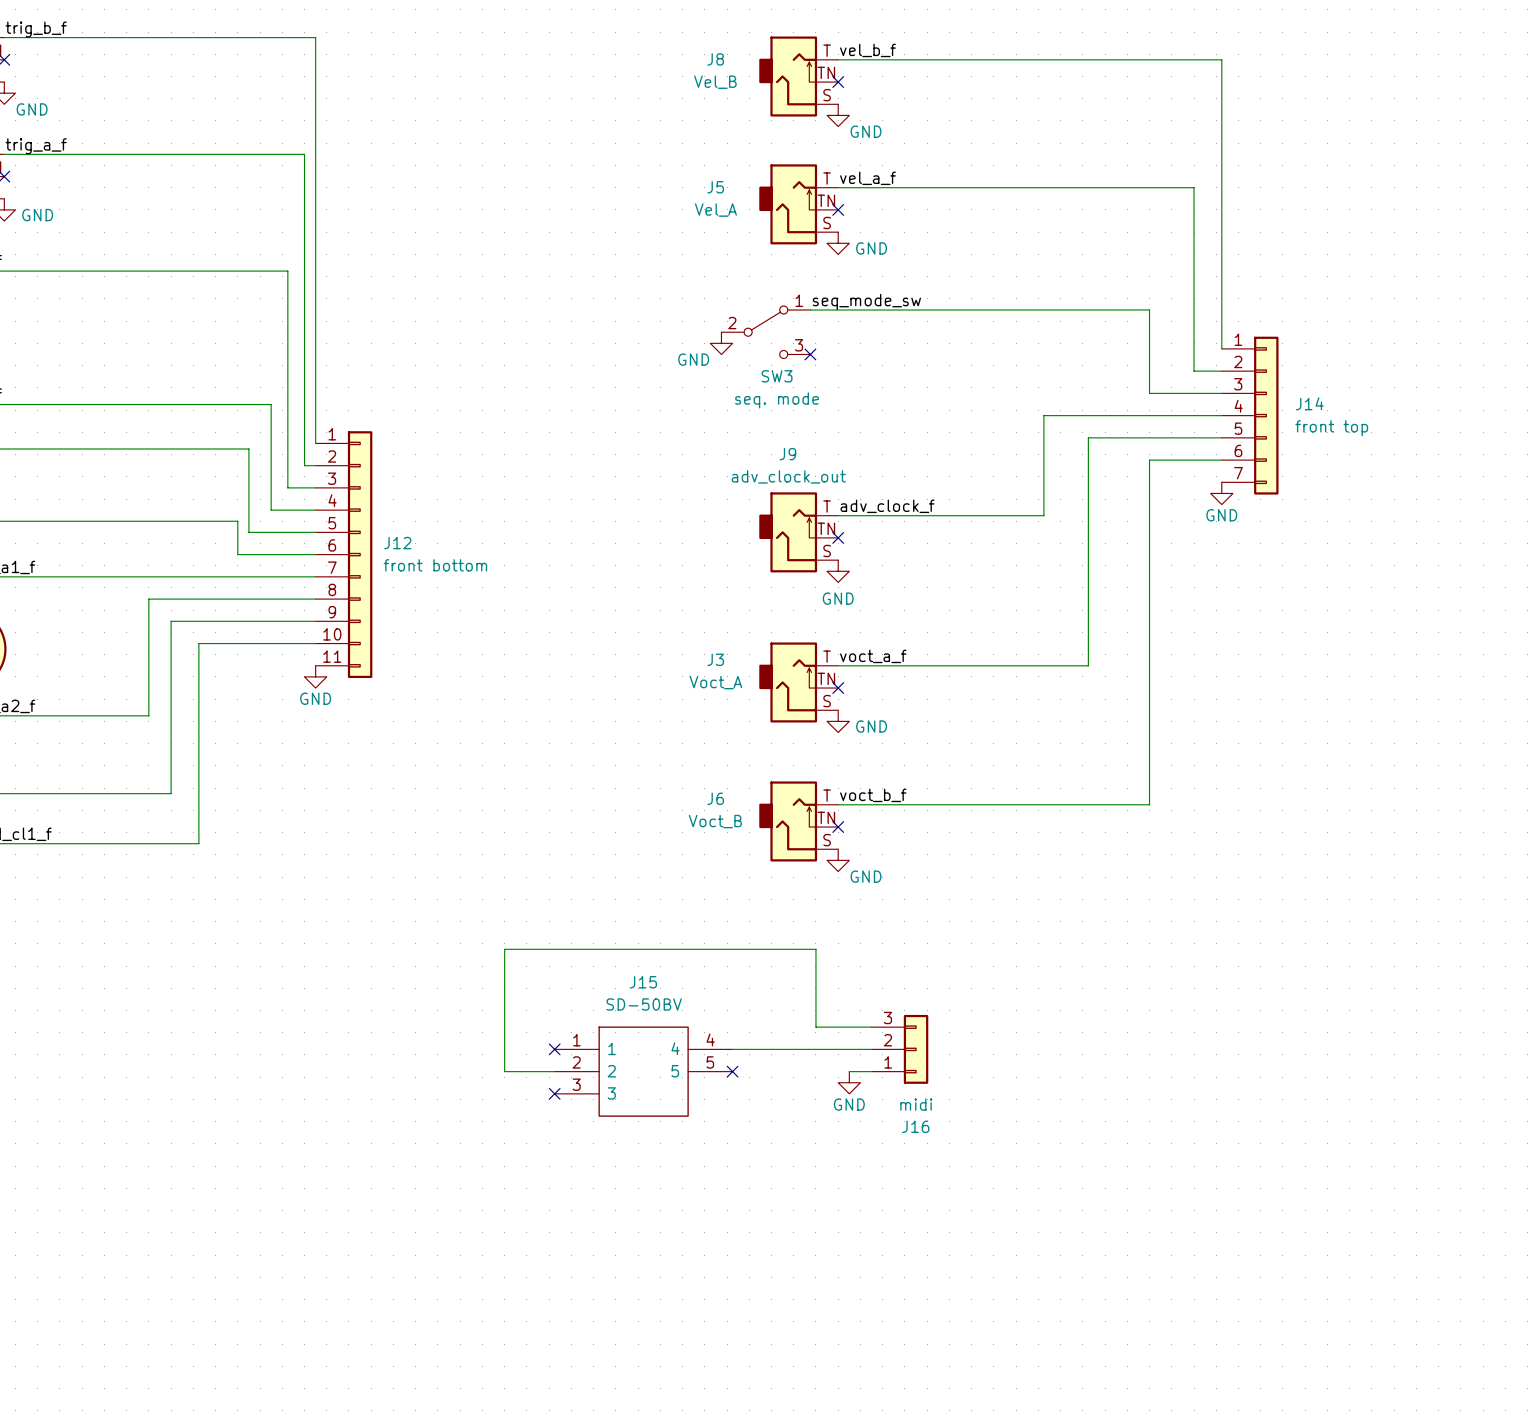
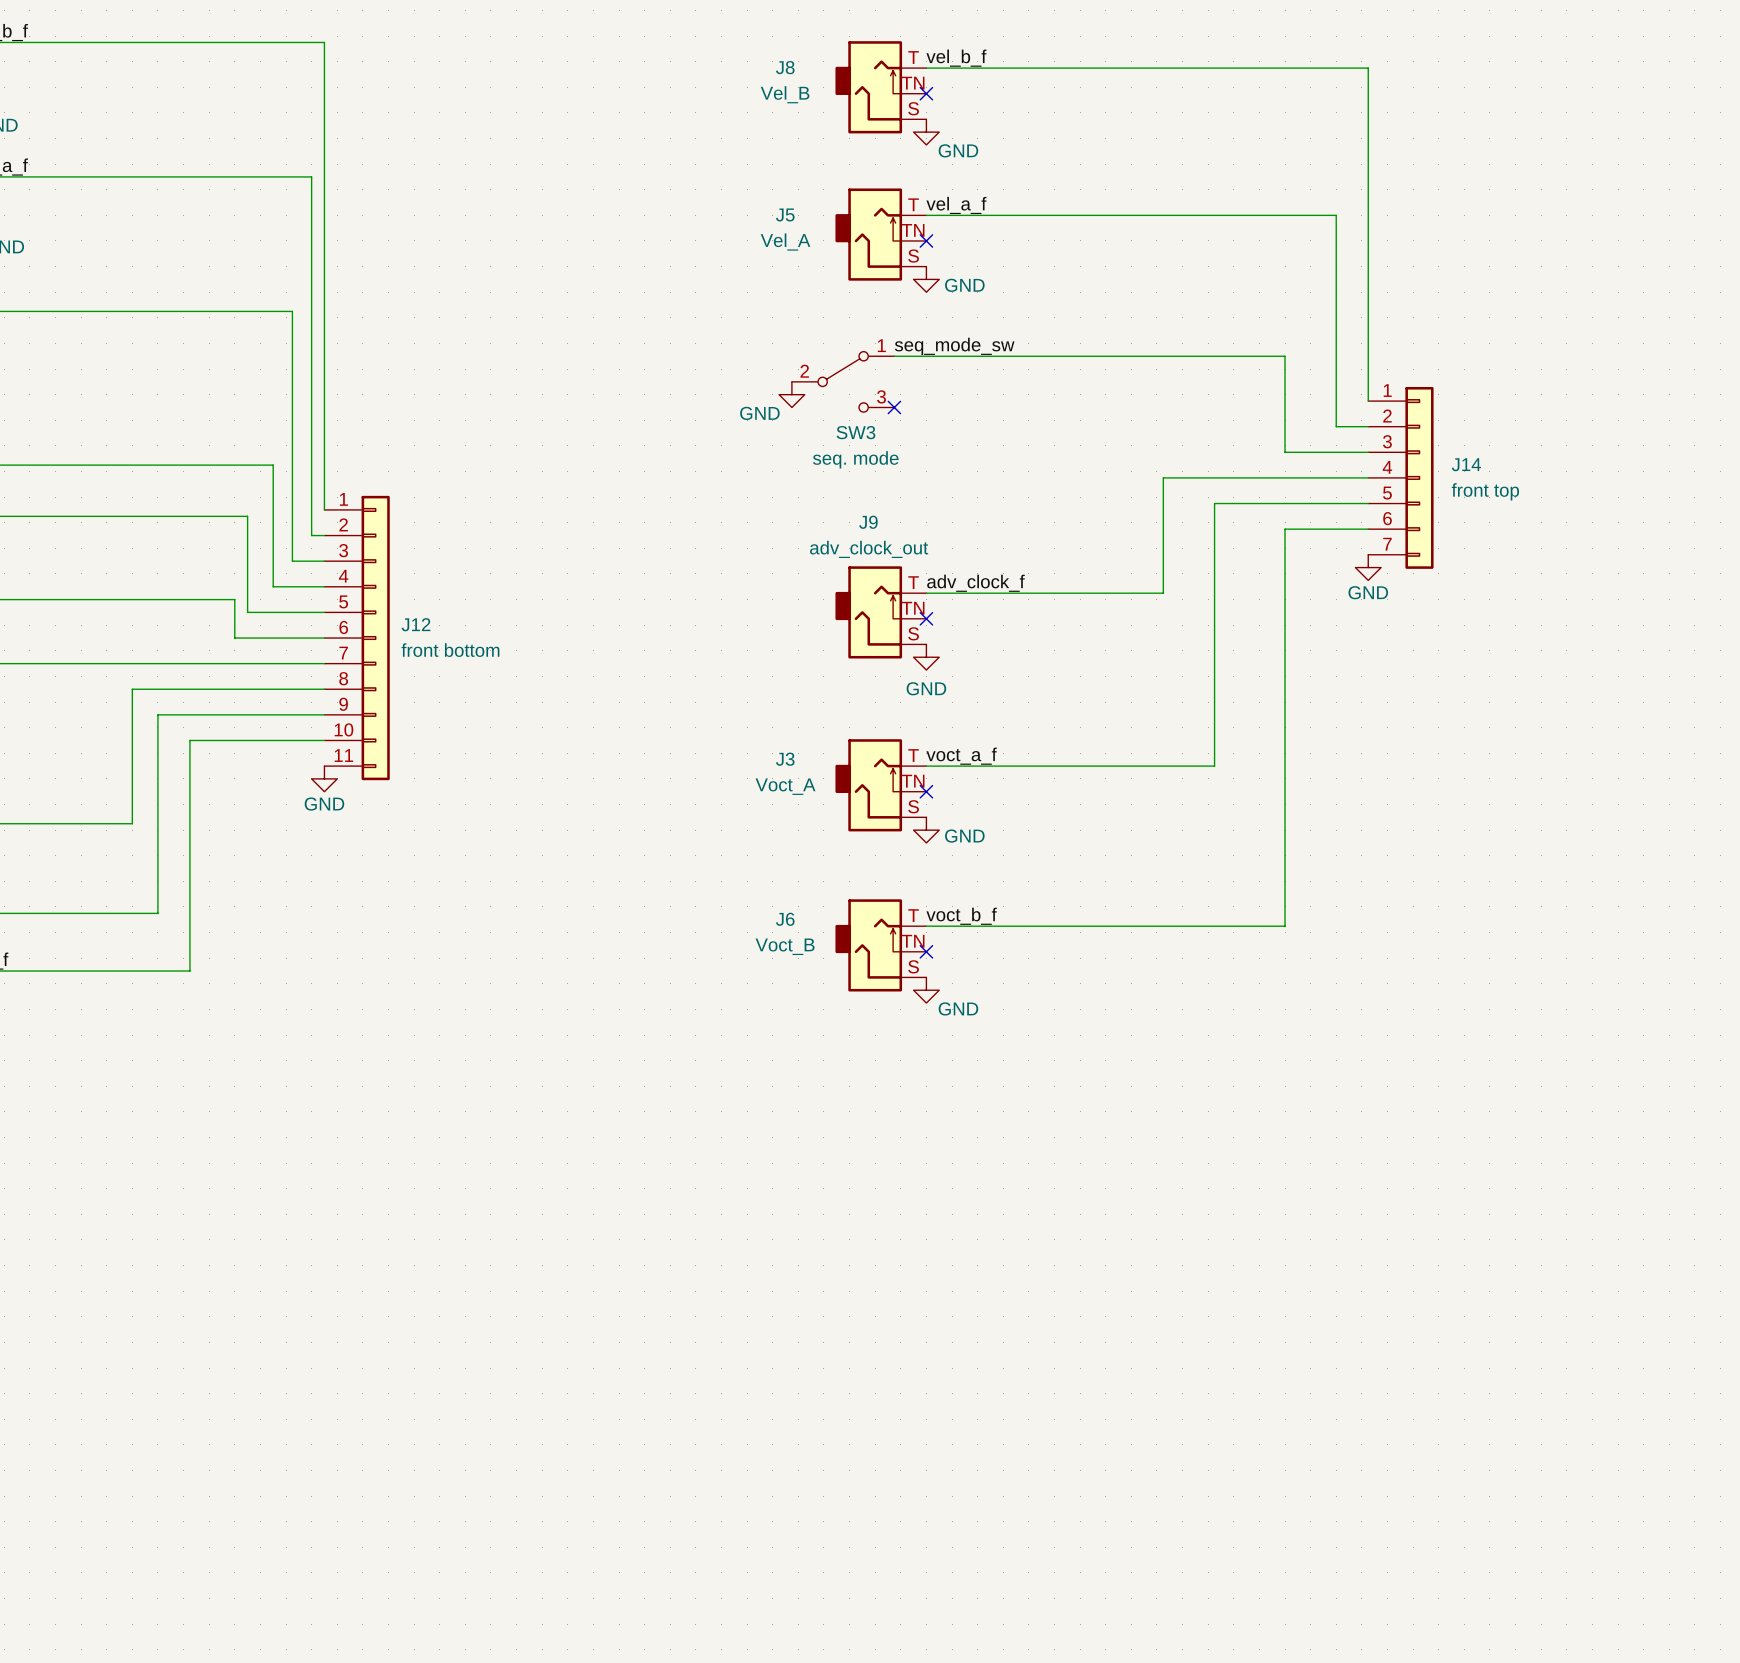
wire: (871, 1027) (815, 1027) (815, 949) (504, 949) (504, 1071) (554, 1071) -> none
no-connect mark: (554, 1049) -> none
wire: (732, 1049) (871, 1049) -> none
J16: midi (899, 1049) -> none
J15: SD-50BV (643, 1071) -> none
no-connect mark: (732, 1071) -> none
wire: (849, 1071) (871, 1071) -> none
power symbol: GND (849, 1082) -> none
no-connect mark: (554, 1093) -> none

